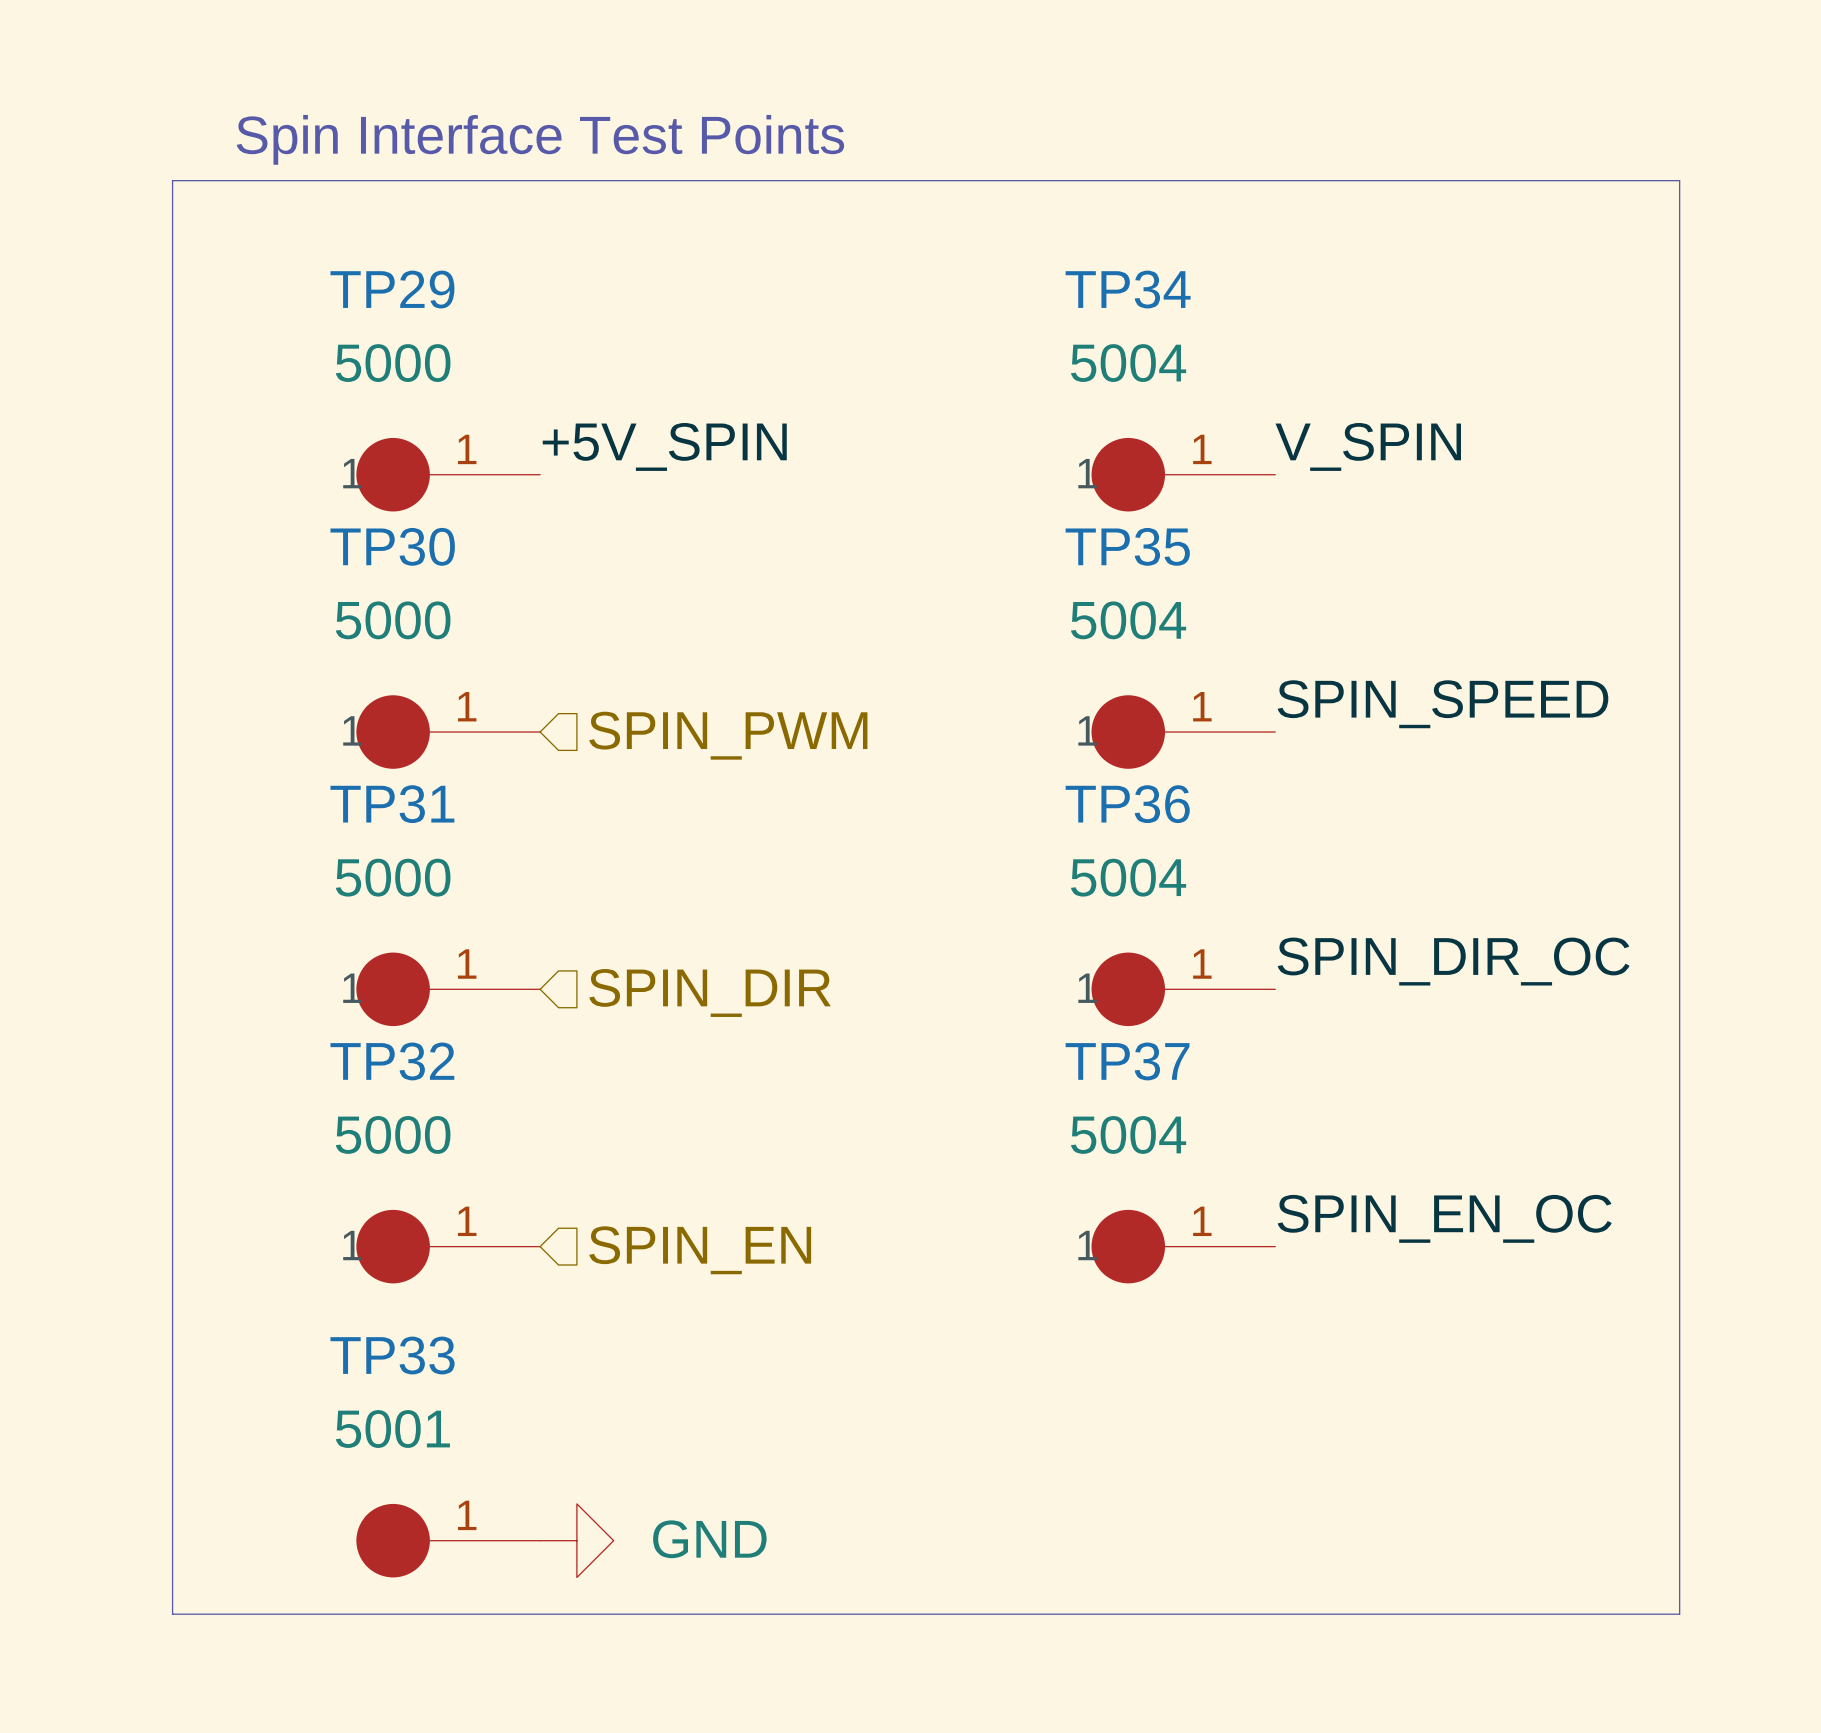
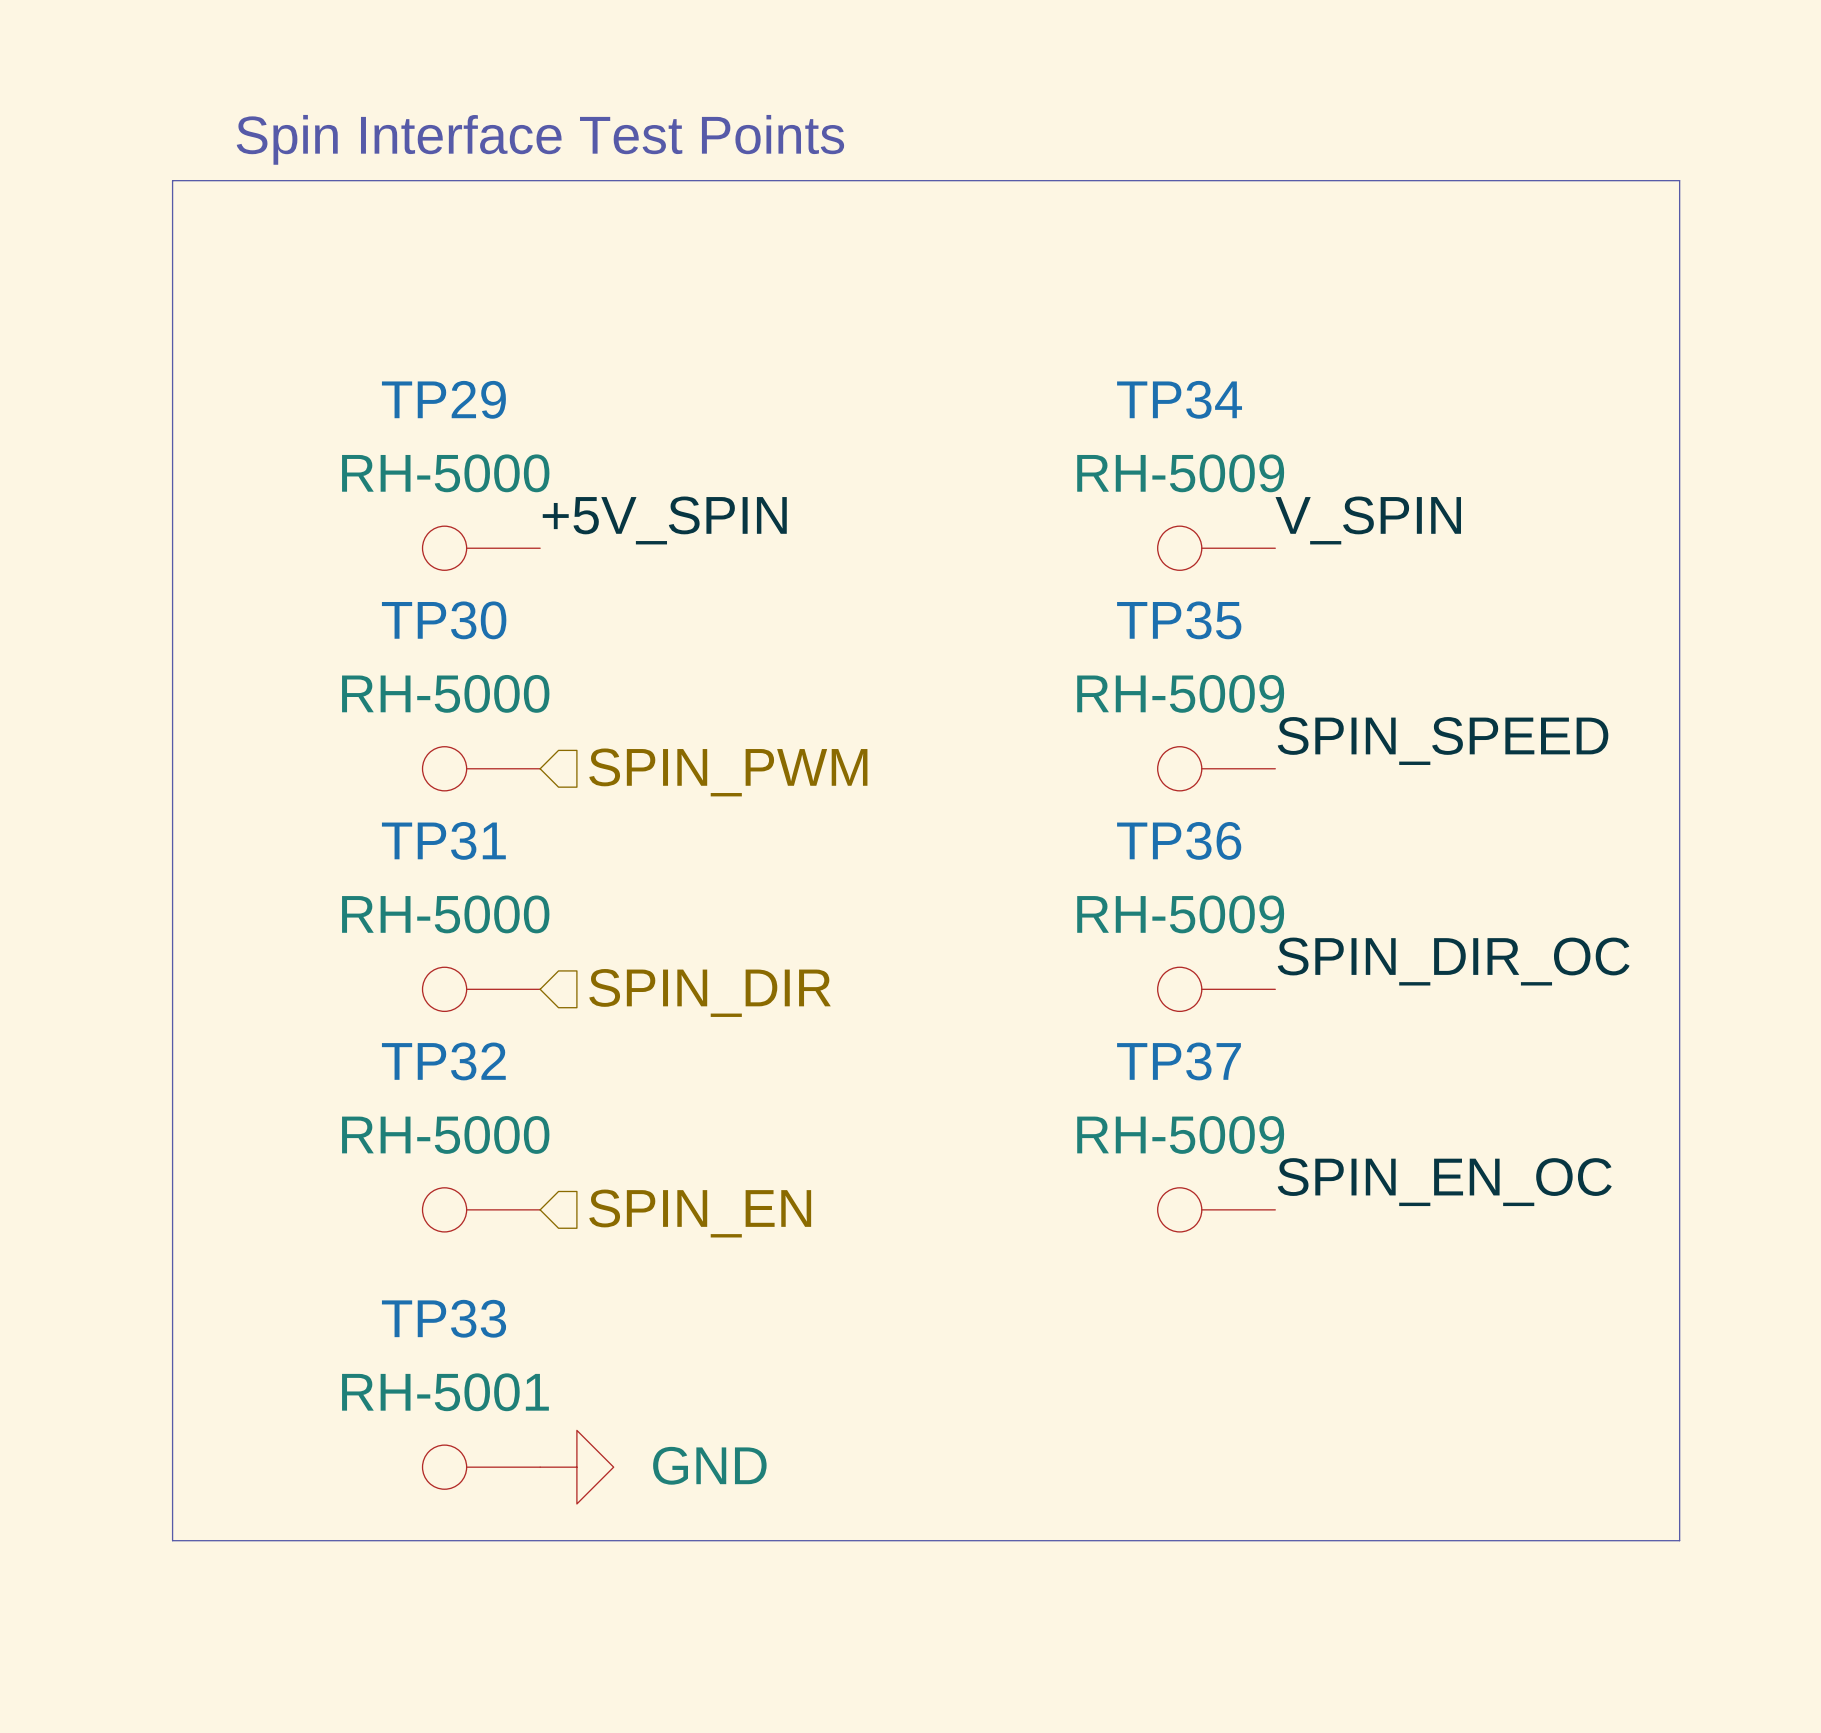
TP29 value: 5000 (393, 363) -> RH-5000 (445, 473)
TP34 value: 5004 (1128, 363) -> RH-5009 (1180, 473)
TP29 symbol: [356, 437, 541, 512] -> [422, 526, 541, 571]
TP34 symbol: [1091, 437, 1276, 512] -> [1157, 526, 1276, 571]
label position: +5V_SPIN (664, 446) -> +5V_SPIN (664, 520)
label position: V_SPIN (1368, 446) -> V_SPIN (1368, 520)
TP30 value: 5000 (393, 620) -> RH-5000 (445, 693)
TP35 value: 5004 (1128, 620) -> RH-5009 (1180, 693)
TP30 symbol: [356, 695, 541, 769] -> [422, 746, 541, 791]
TP35 symbol: [1091, 695, 1276, 769] -> [1157, 746, 1276, 791]
label position: SPIN_SPEED (1443, 704) -> SPIN_SPEED (1443, 741)
hierarchical label position: SPIN_PWM (728, 735) -> SPIN_PWM (728, 772)
TP31 value: 5000 (393, 877) -> RH-5000 (445, 914)
TP36 value: 5004 (1128, 877) -> RH-5009 (1180, 914)
TP31 symbol: [356, 952, 541, 1027] -> [422, 967, 541, 1012]
TP36 symbol: [1091, 952, 1276, 1027] -> [1157, 967, 1276, 1012]
TP32 value: 5000 (393, 1134) -> RH-5000 (445, 1134)
TP37 value: 5004 (1128, 1134) -> RH-5009 (1180, 1134)
TP32 symbol: [356, 1209, 541, 1284] -> [422, 1187, 541, 1232]
TP37 symbol: [1091, 1209, 1276, 1284] -> [1157, 1187, 1276, 1232]
label position: SPIN_EN_OC (1444, 1218) -> SPIN_EN_OC (1444, 1182)
hierarchical label position: SPIN_EN (700, 1250) -> SPIN_EN (700, 1213)
TP33 value: 5001 (392, 1429) -> RH-5001 (445, 1392)
TP33 symbol: [356, 1503, 541, 1578] -> [422, 1445, 541, 1490]
line: (172, 1540) (172, 1614) (1679, 1614) (1679, 1540) -> (172, 1540) (1679, 1540)
power symbol position: GND (576, 1540) -> GND (576, 1467)

